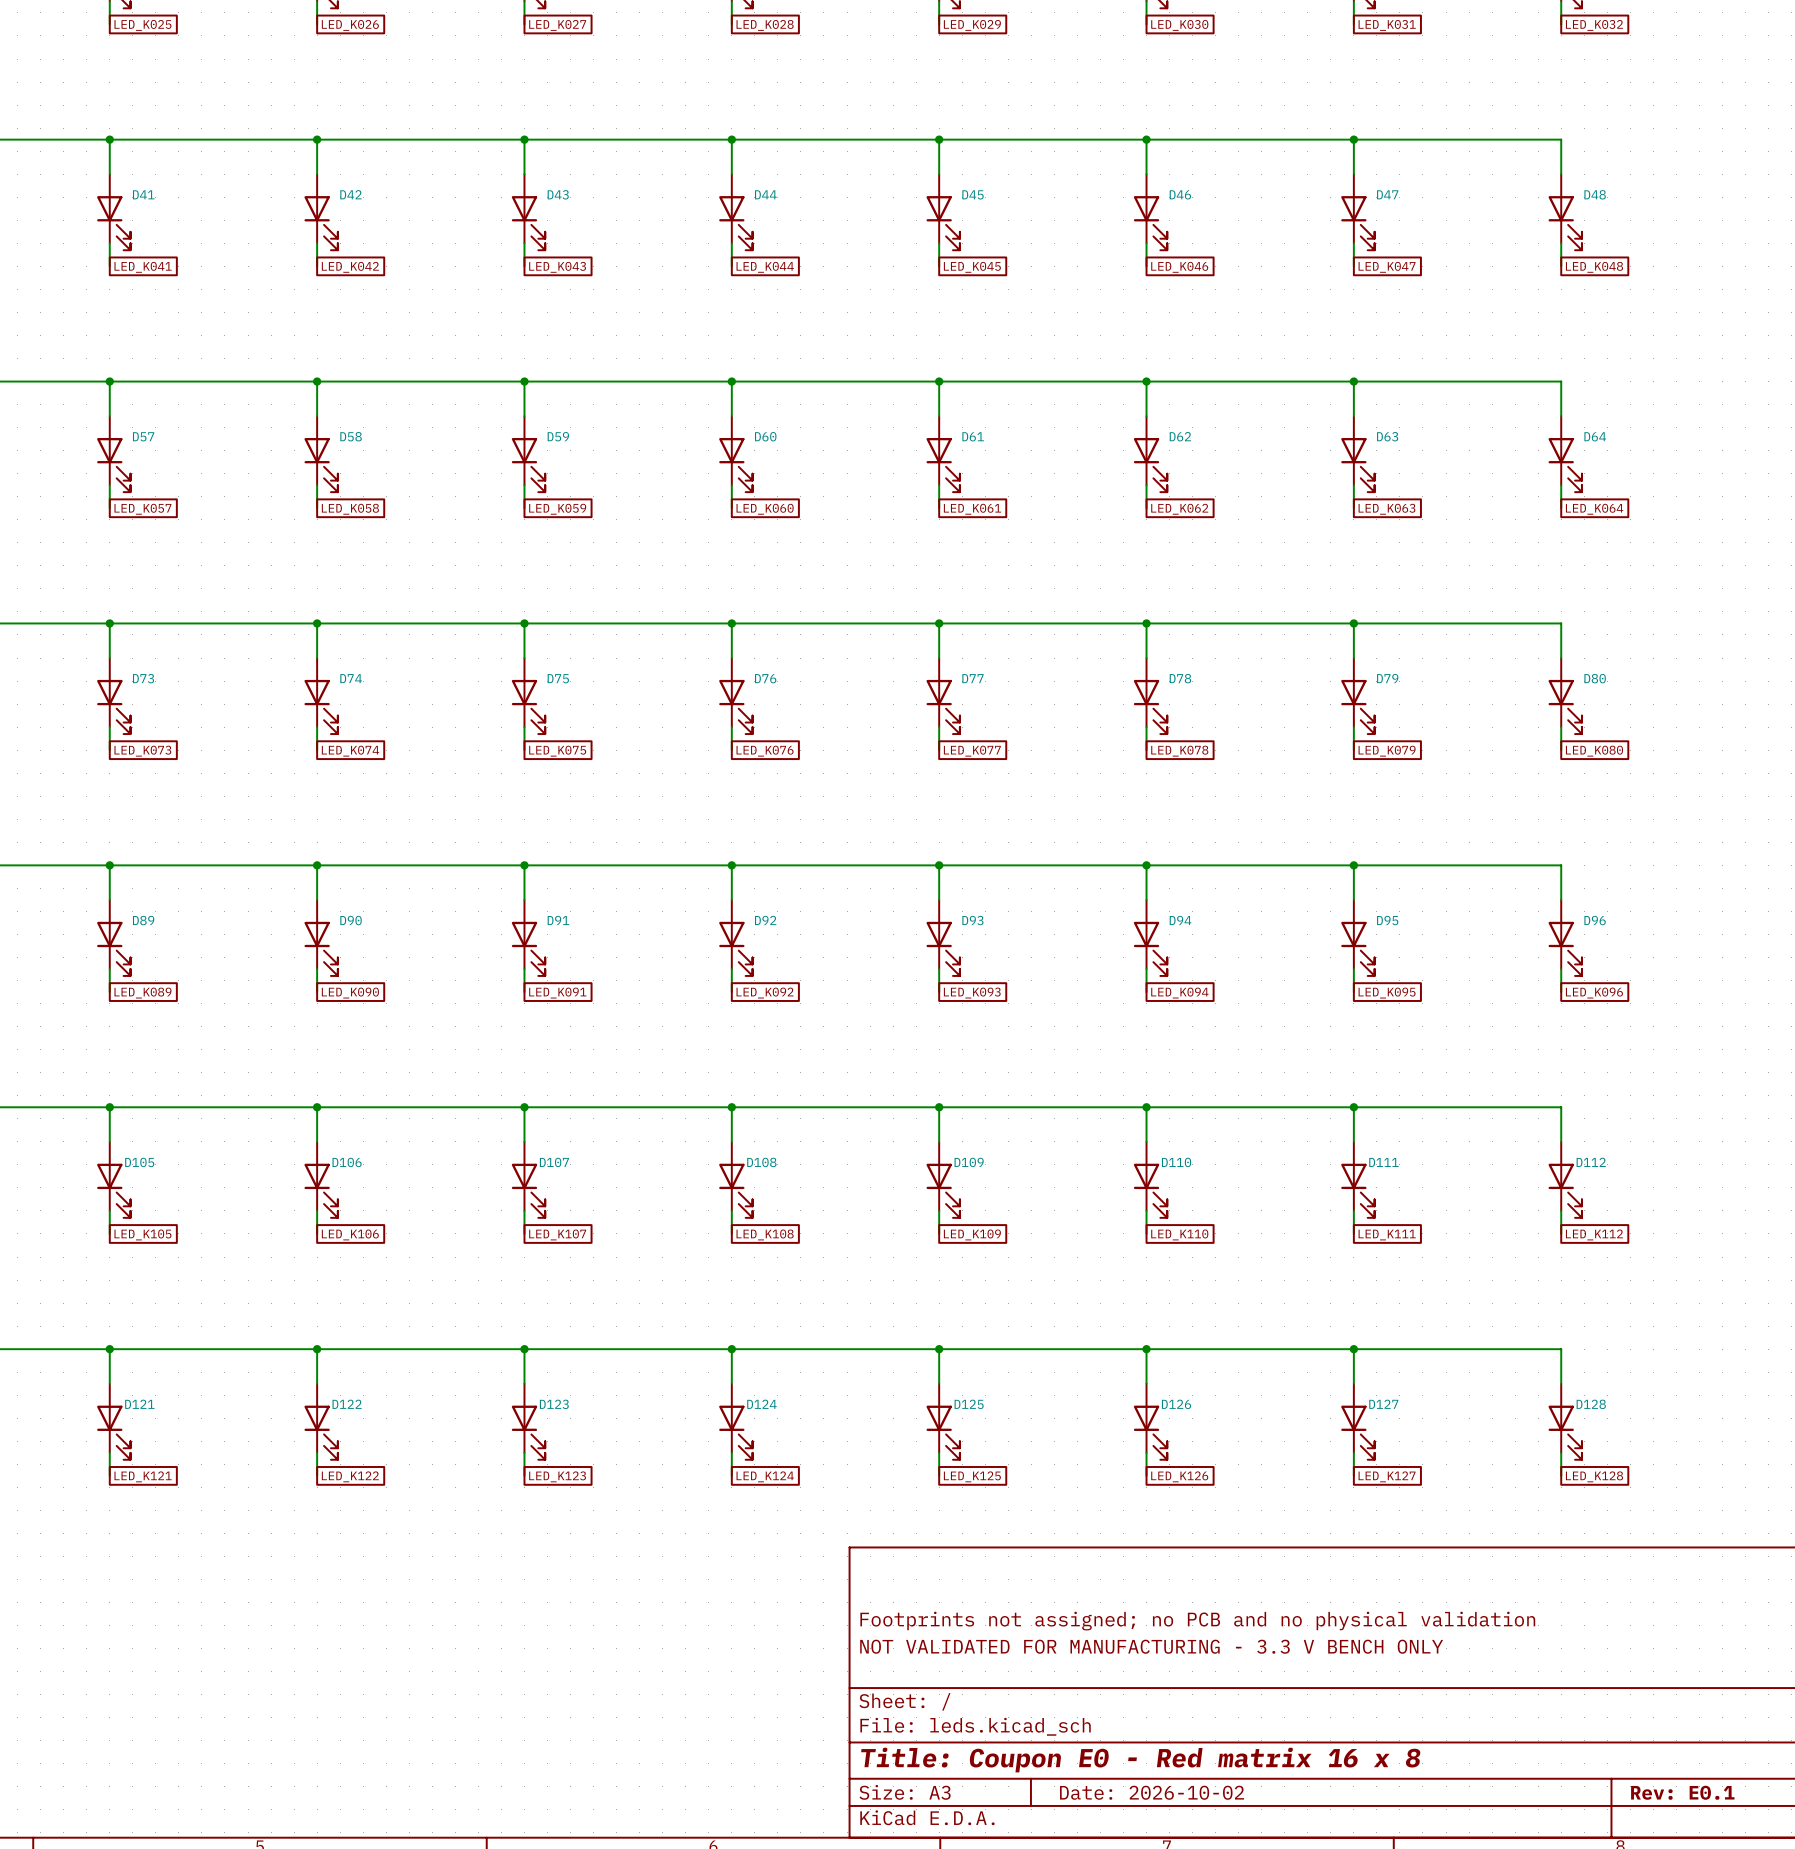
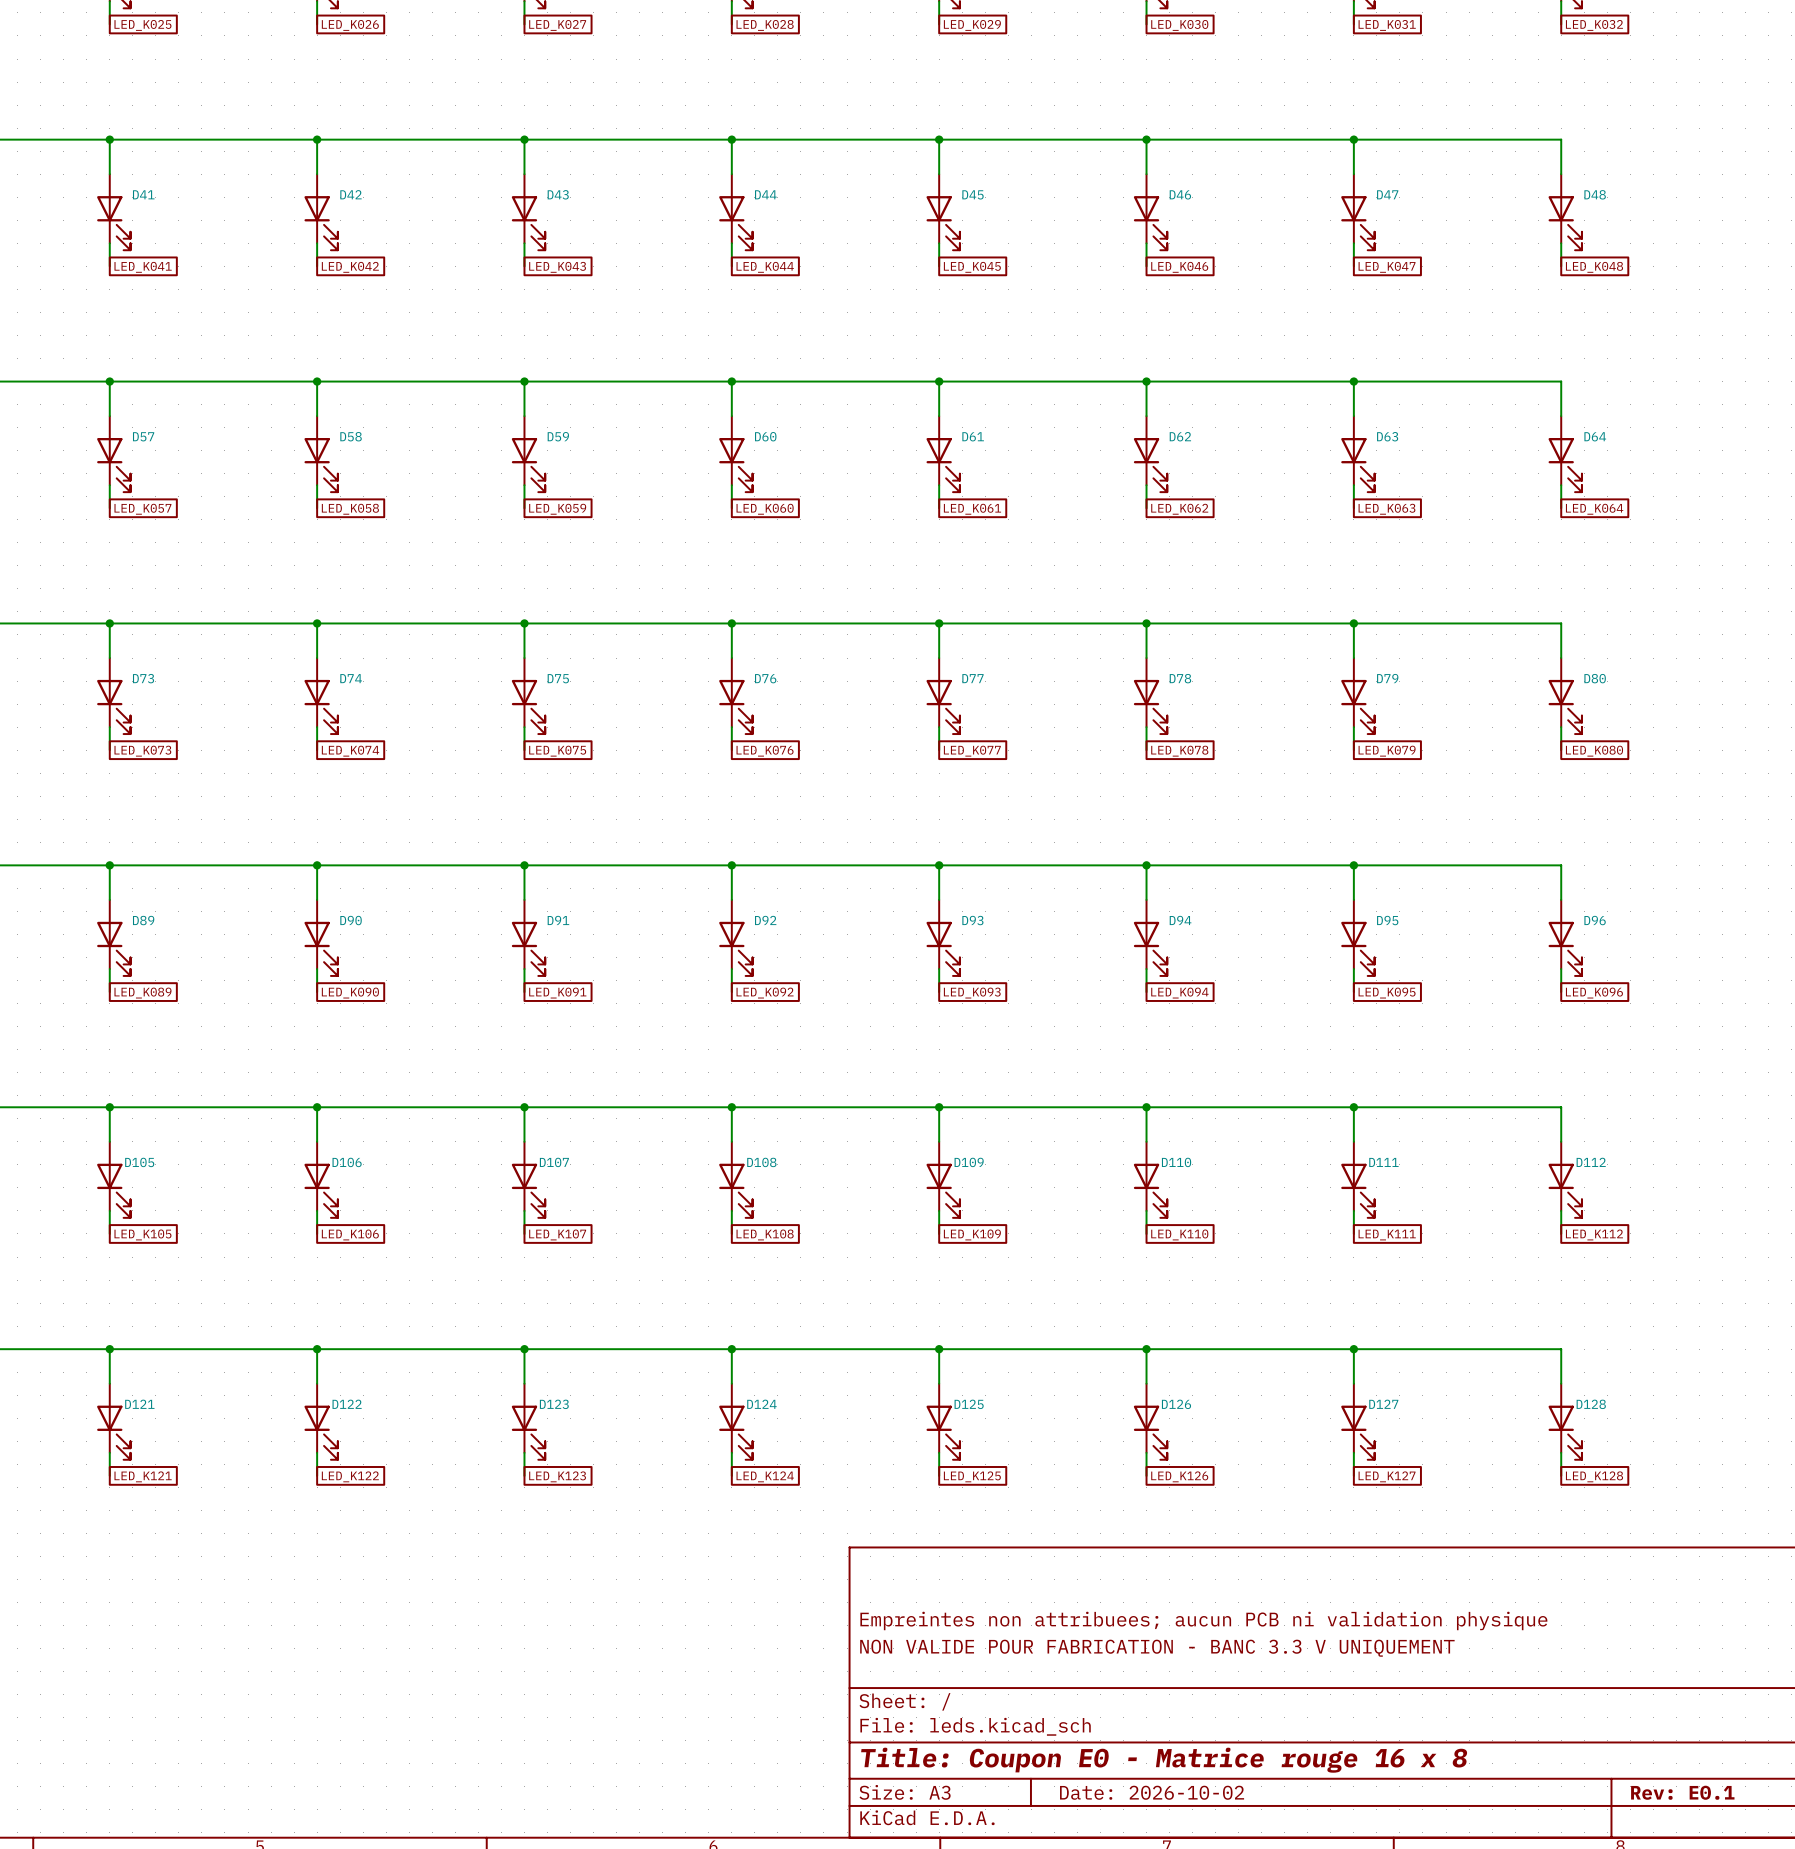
title block: Footprints not assigned; no PCB and no physical validation (1197, 1621) -> Empreintes non attribuees; aucun PCB ni validation physique (1203, 1620)
title block: NOT VALIDATED FOR MANUFACTURING - 3.3 V BENCH ONLY (1151, 1646) -> NON VALIDE POUR FABRICATION - BANC 3.3 V UNIQUEMENT (1157, 1648)
title block: Title: Coupon E0 - Red matrix 16 x 8 (1140, 1760) -> Title: Coupon E0 - Matrice rouge 16 x 8 (1164, 1760)

